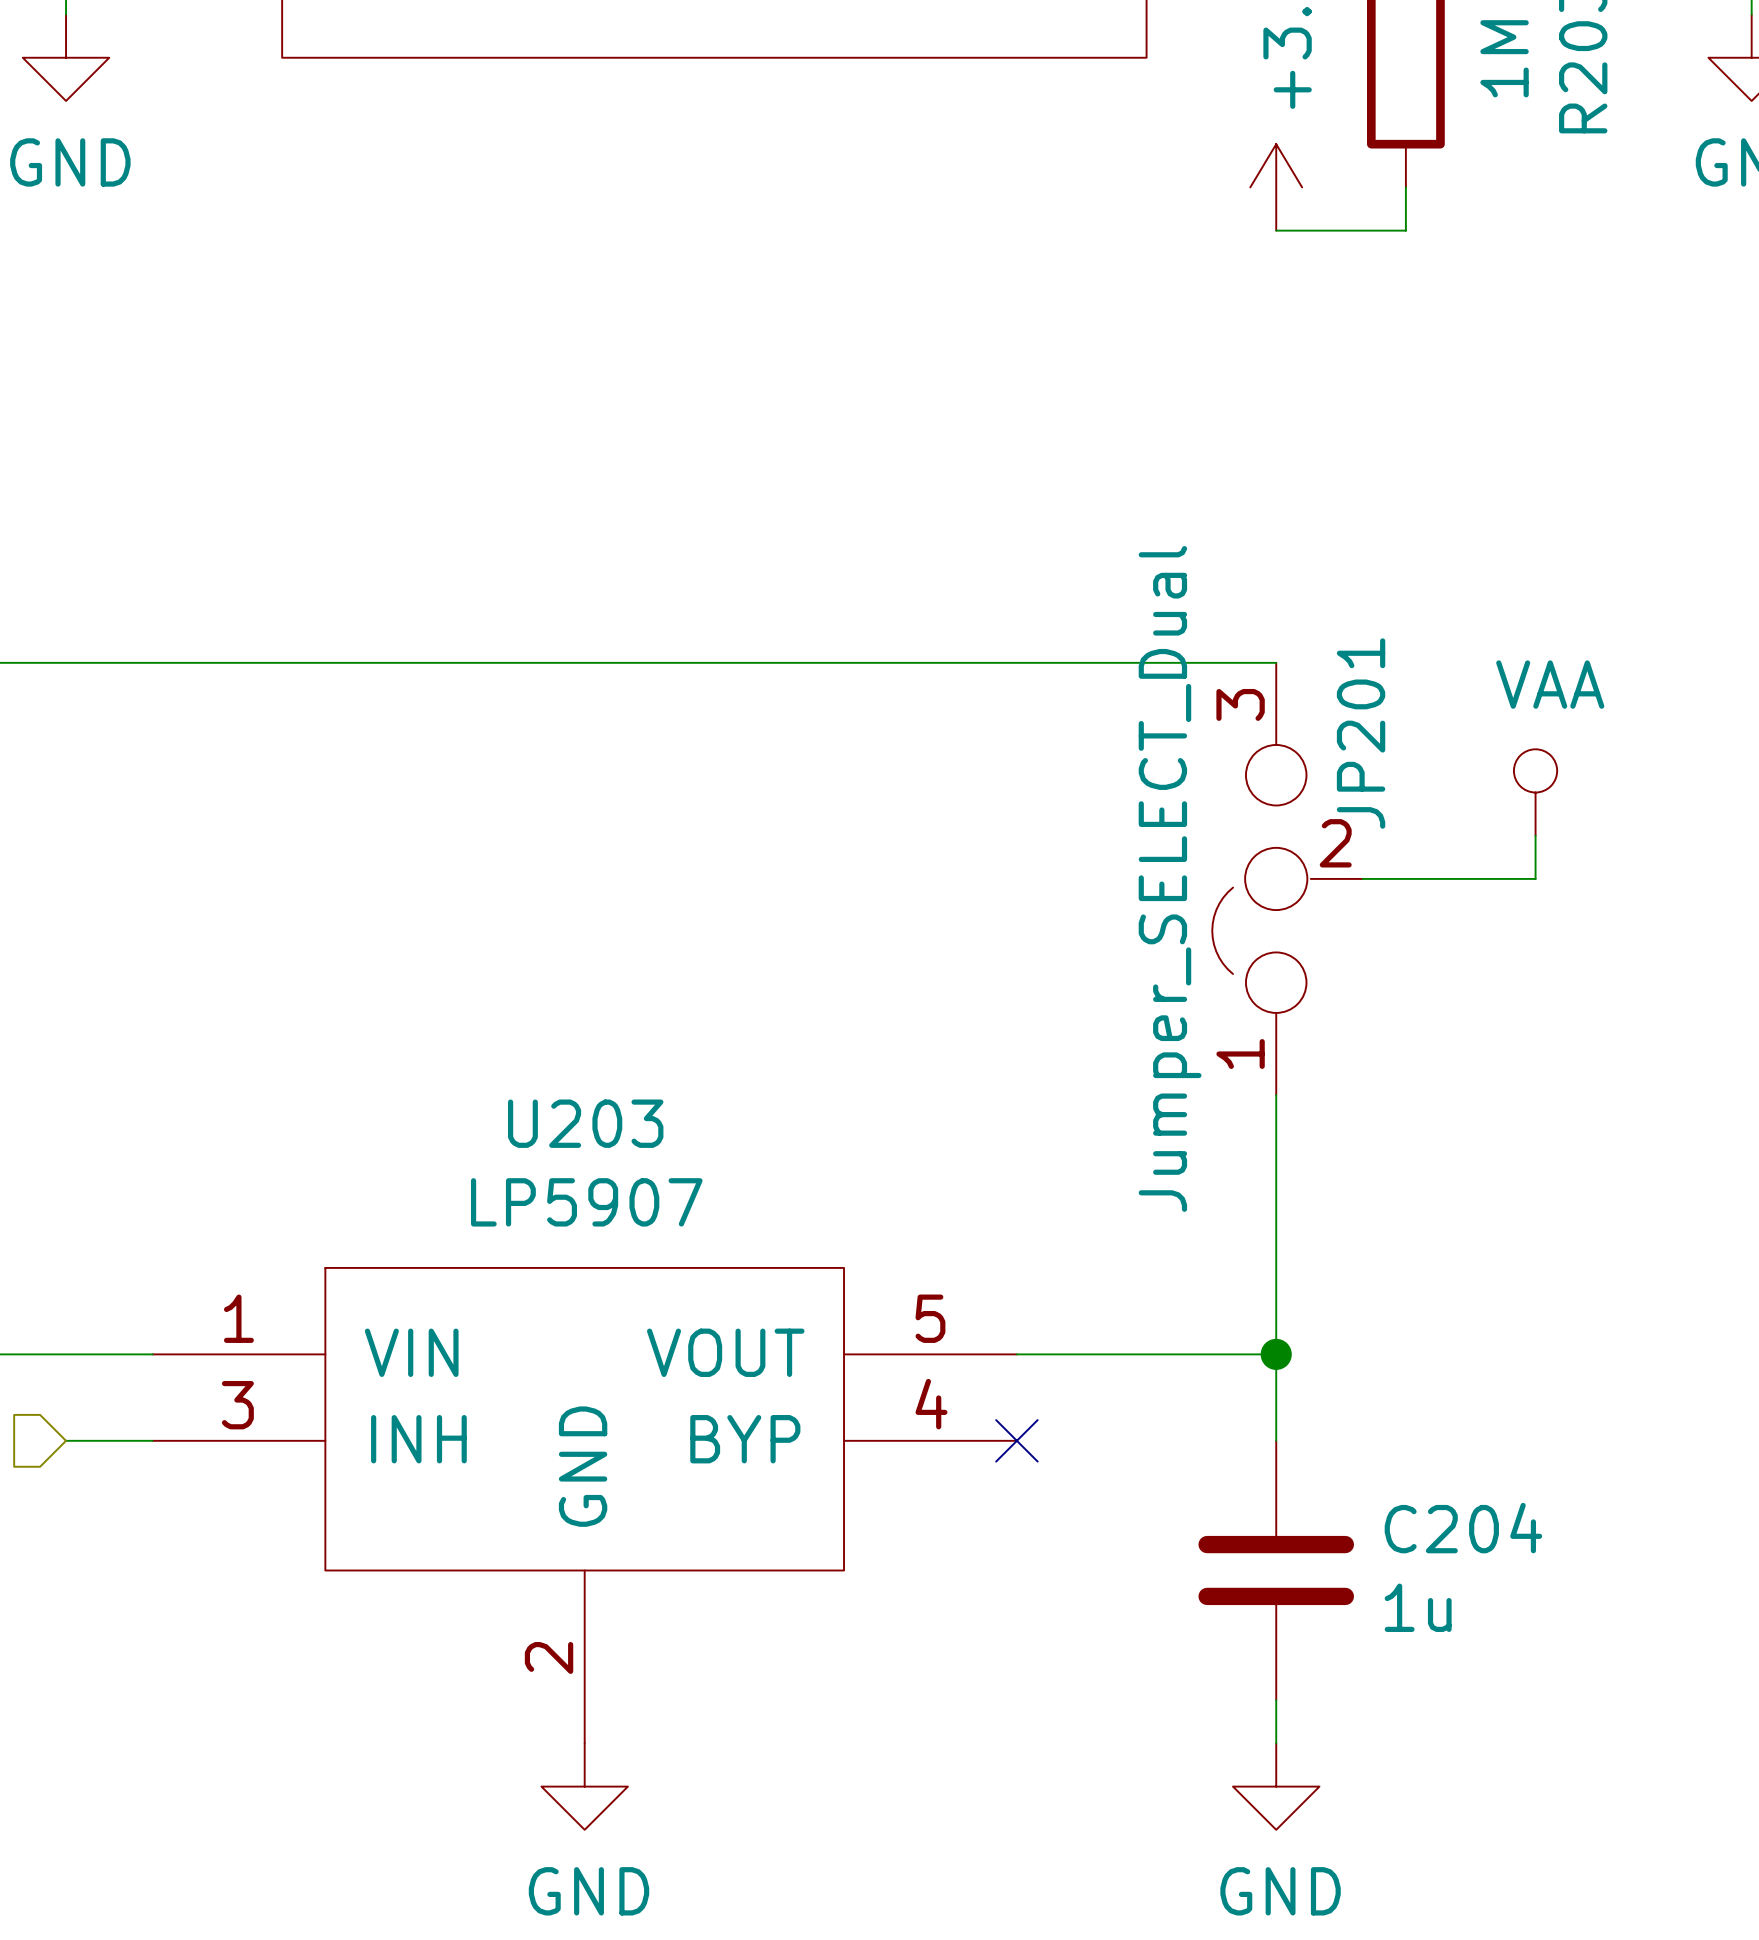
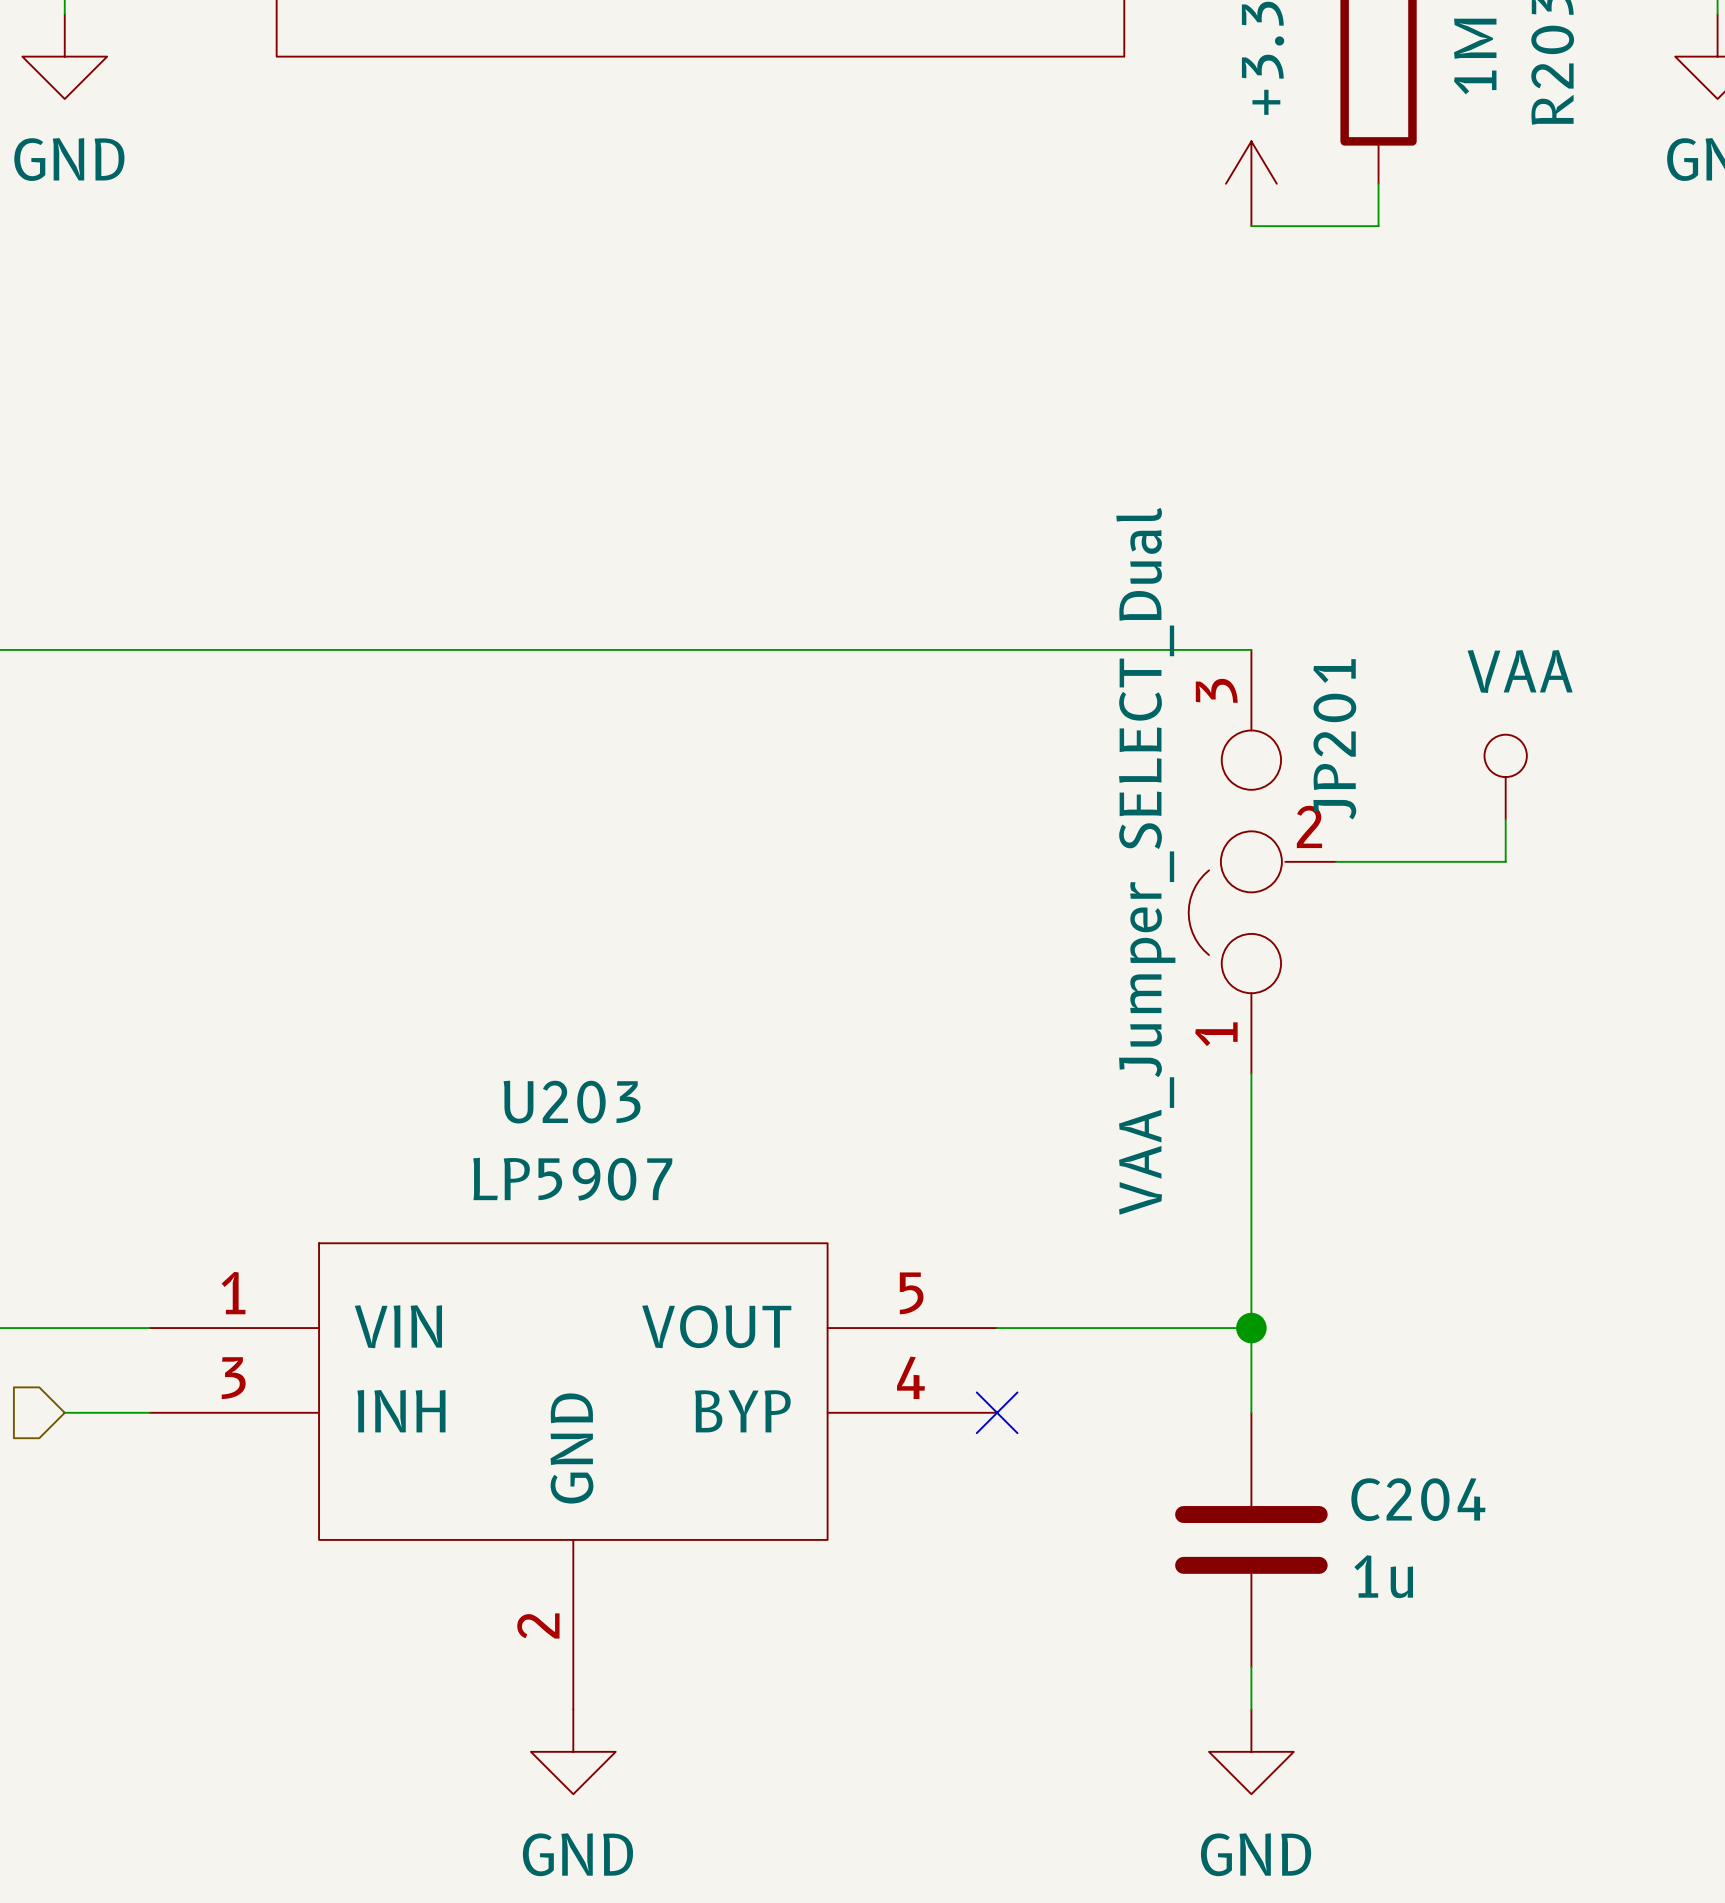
JP201 value: Jumper_SELECT_Dual (1170, 878) -> VAA_Jumper_SELECT_Dual (1145, 861)

